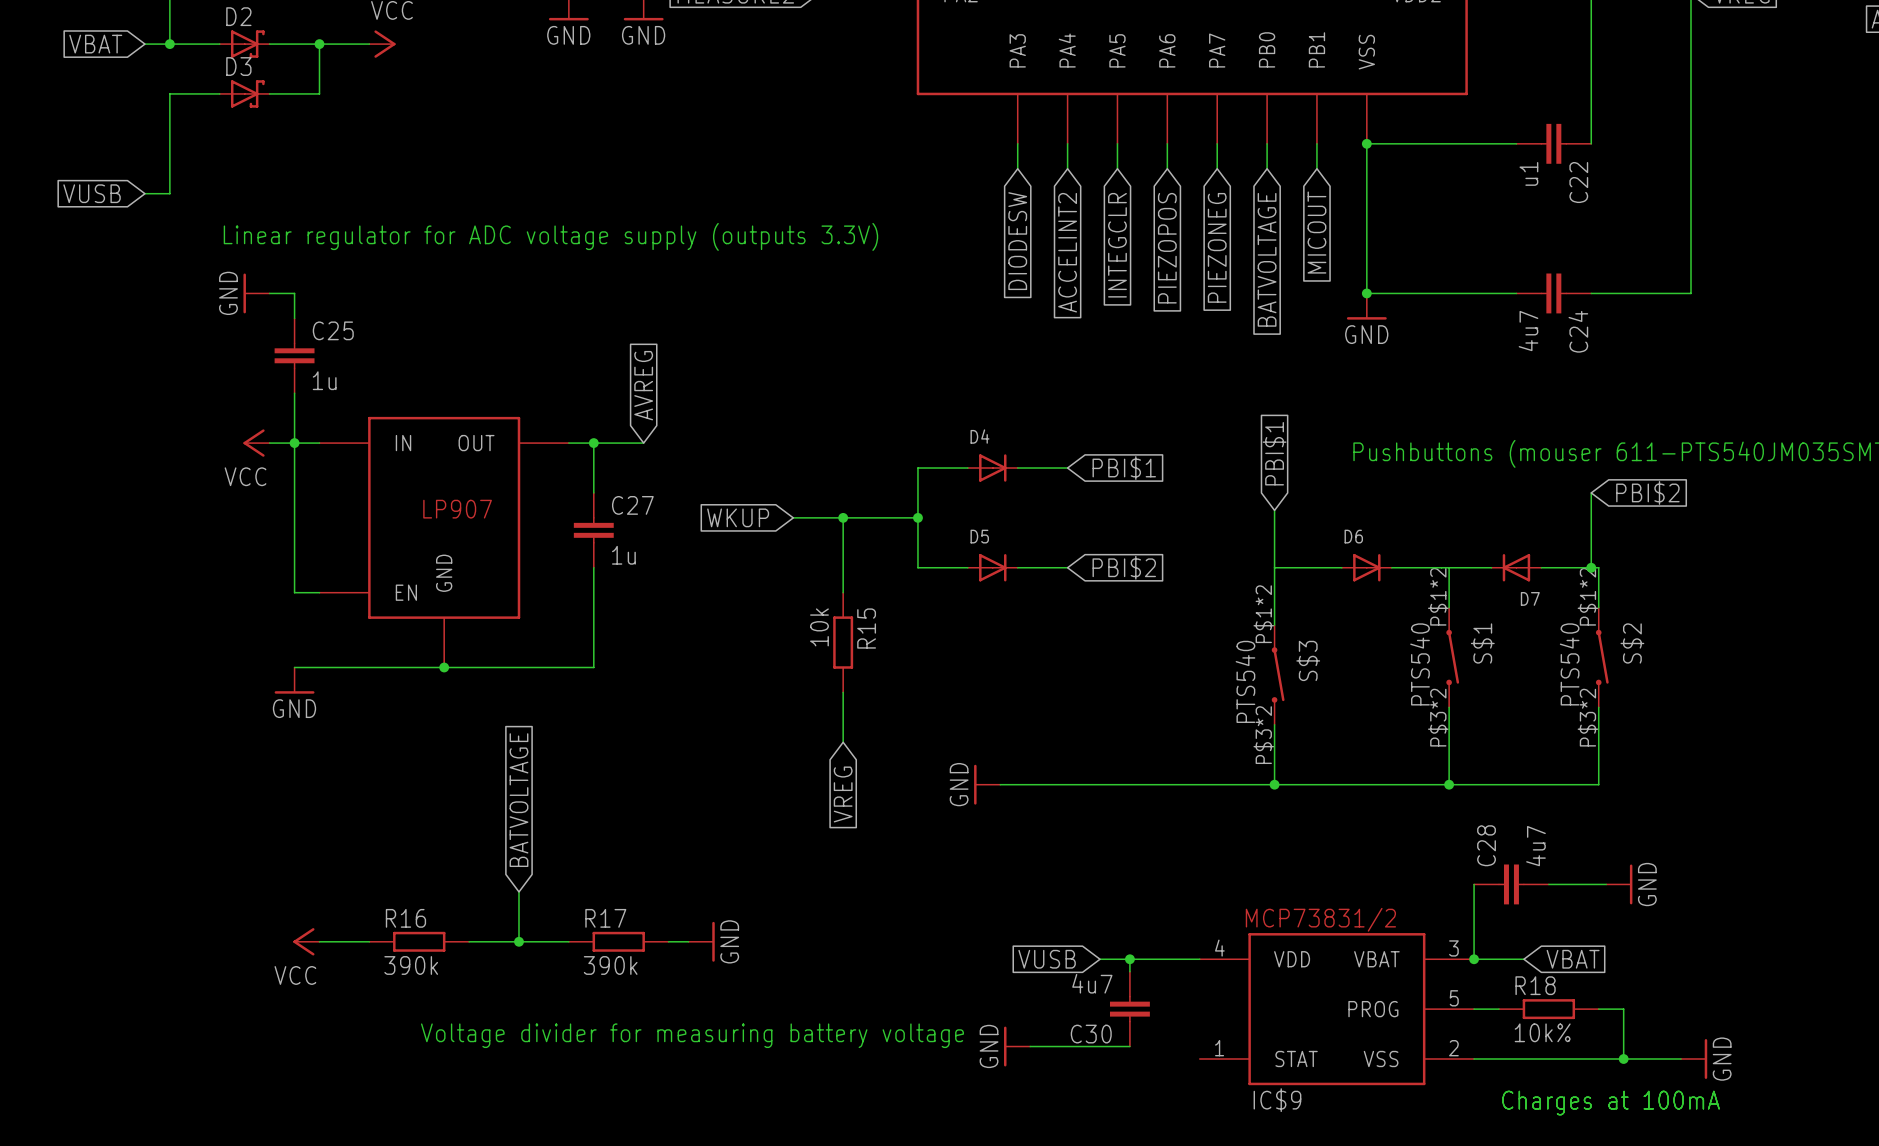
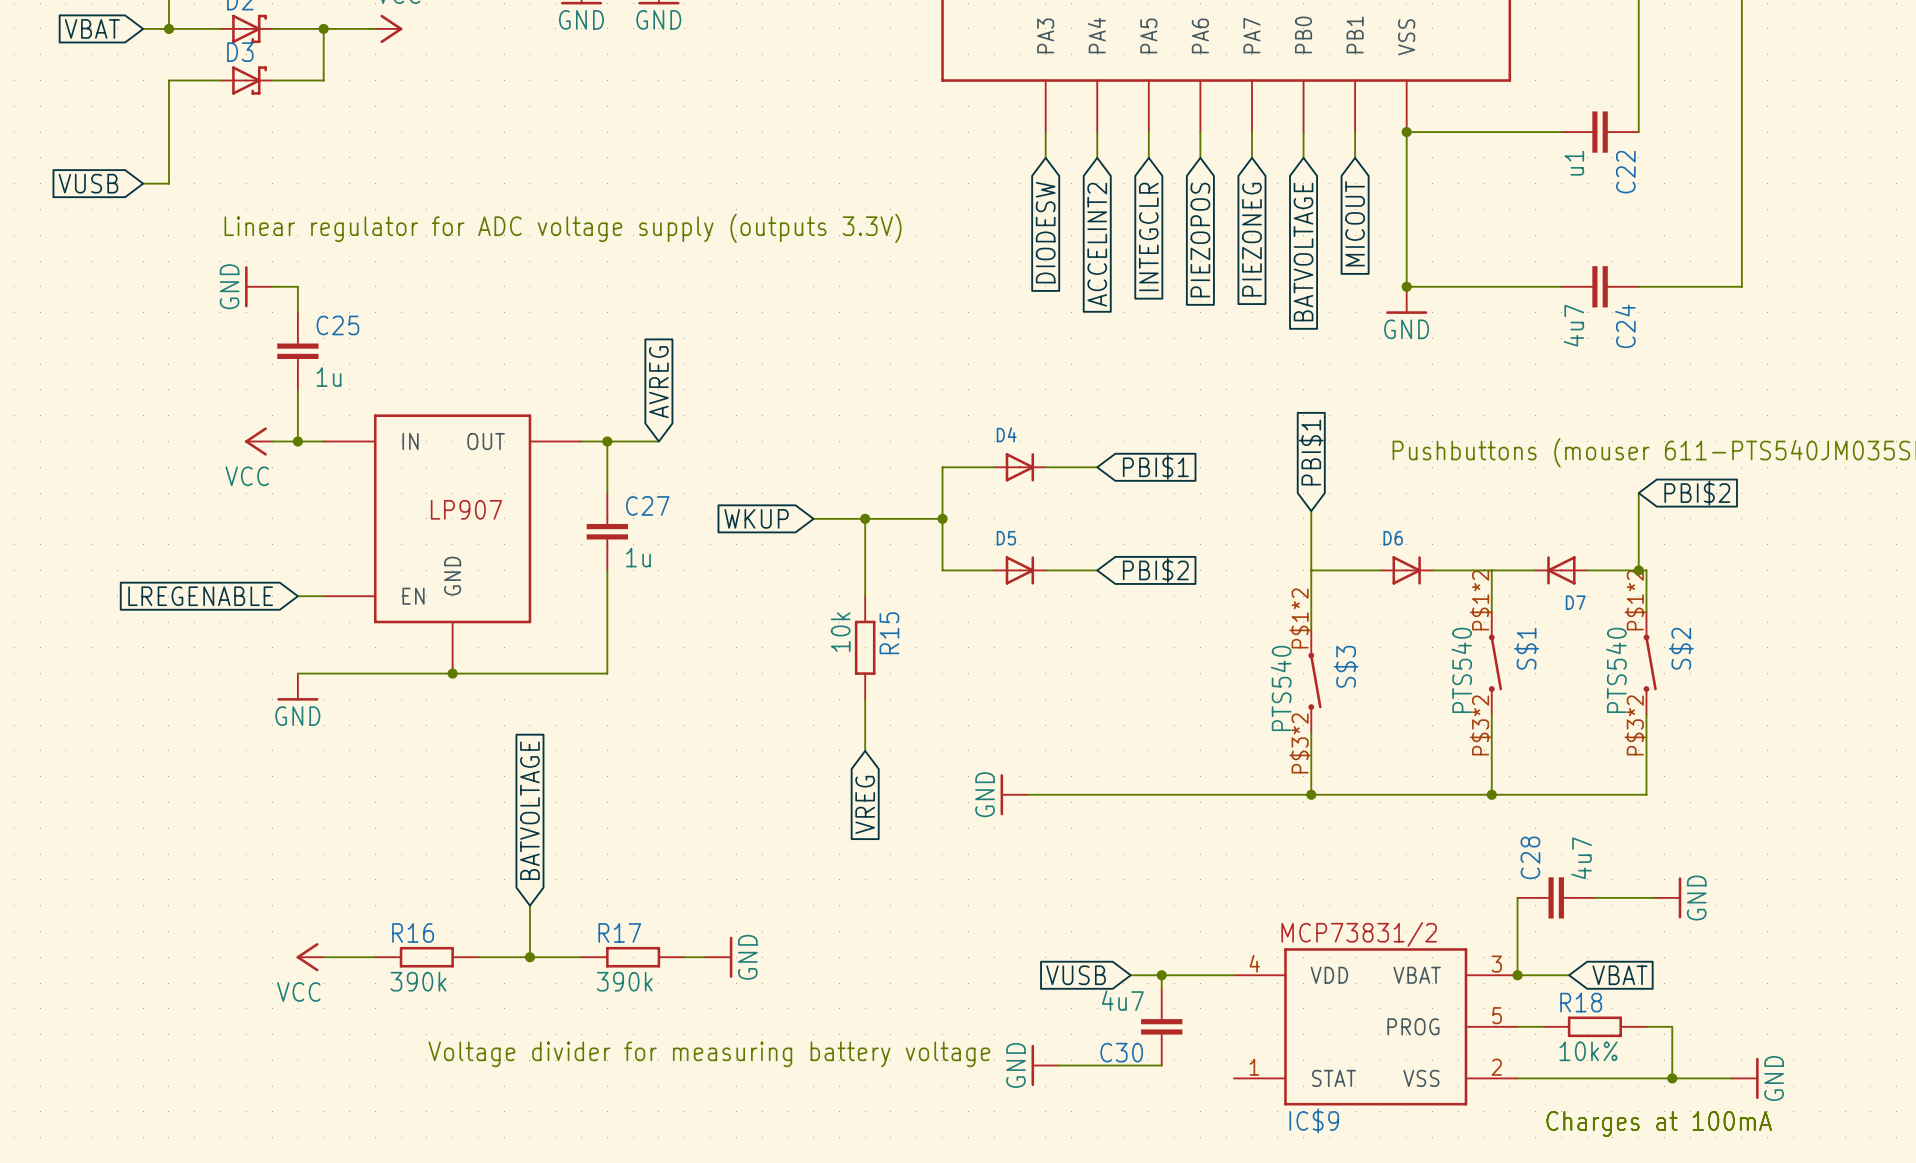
wire: (294, 443) (294, 592) -> none
global label: none -> LREGENABLE (200, 596)

